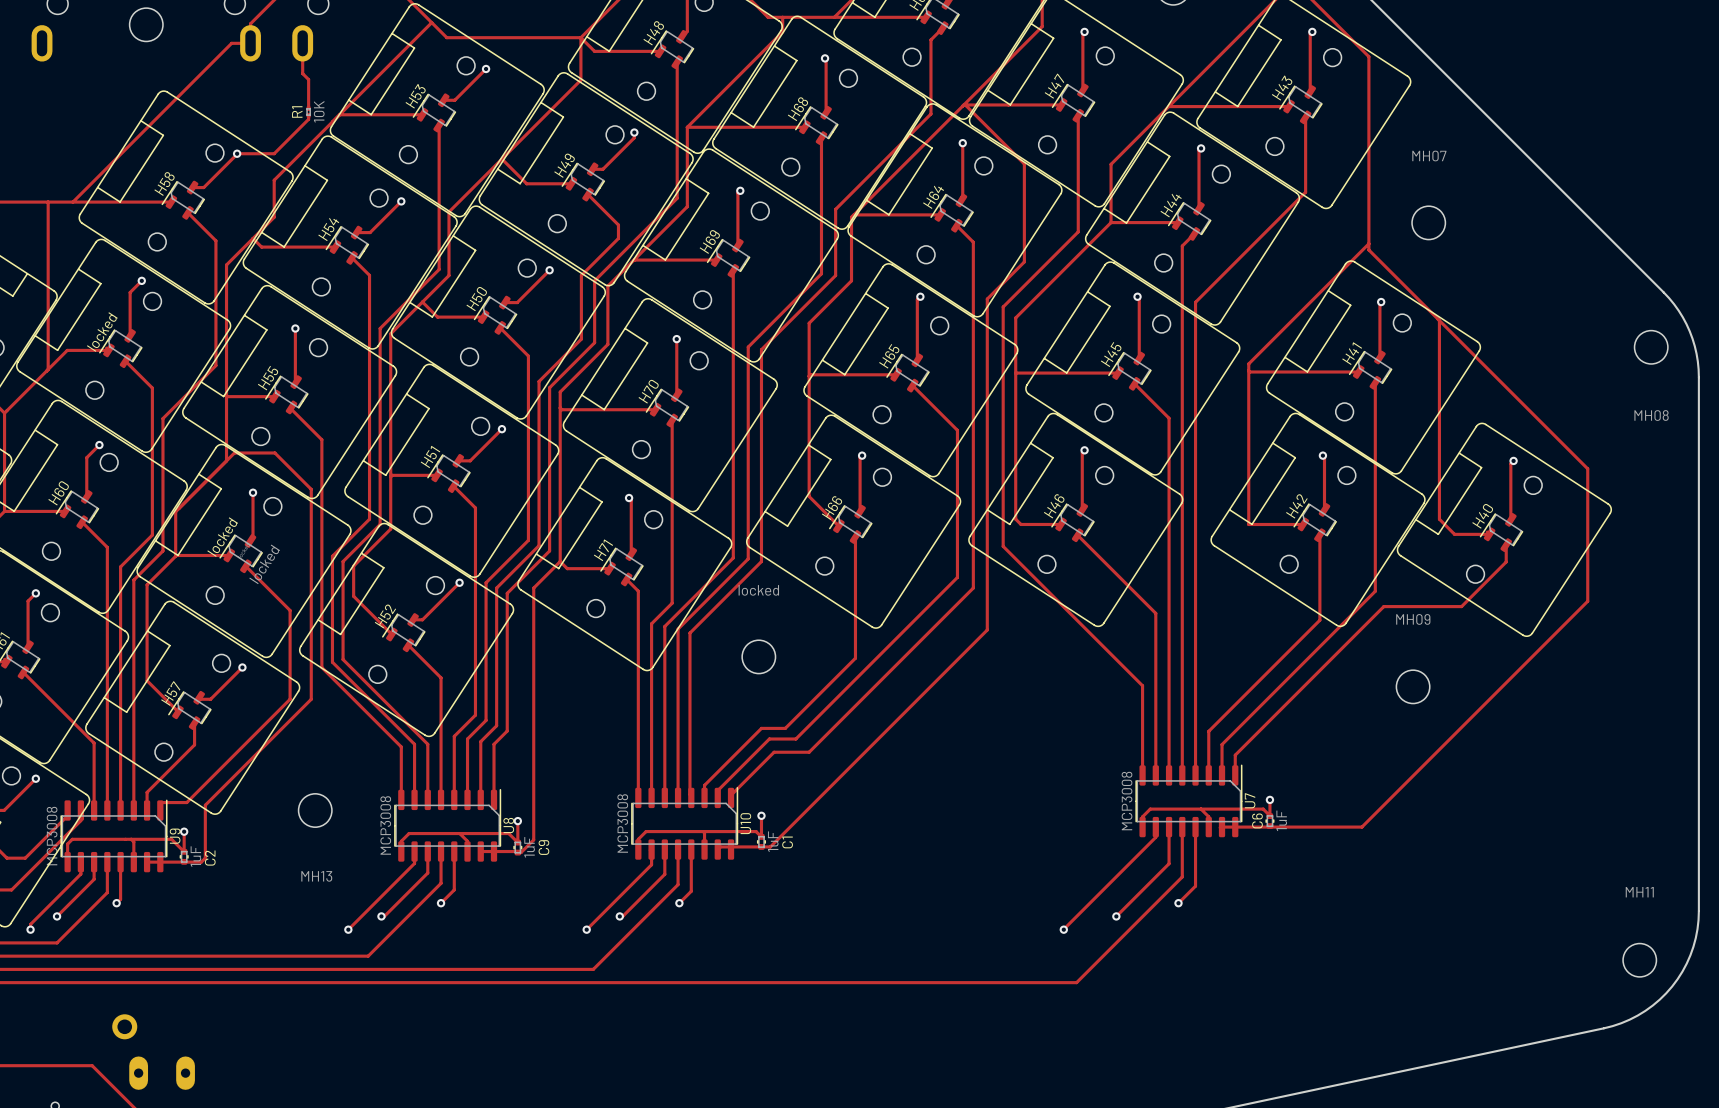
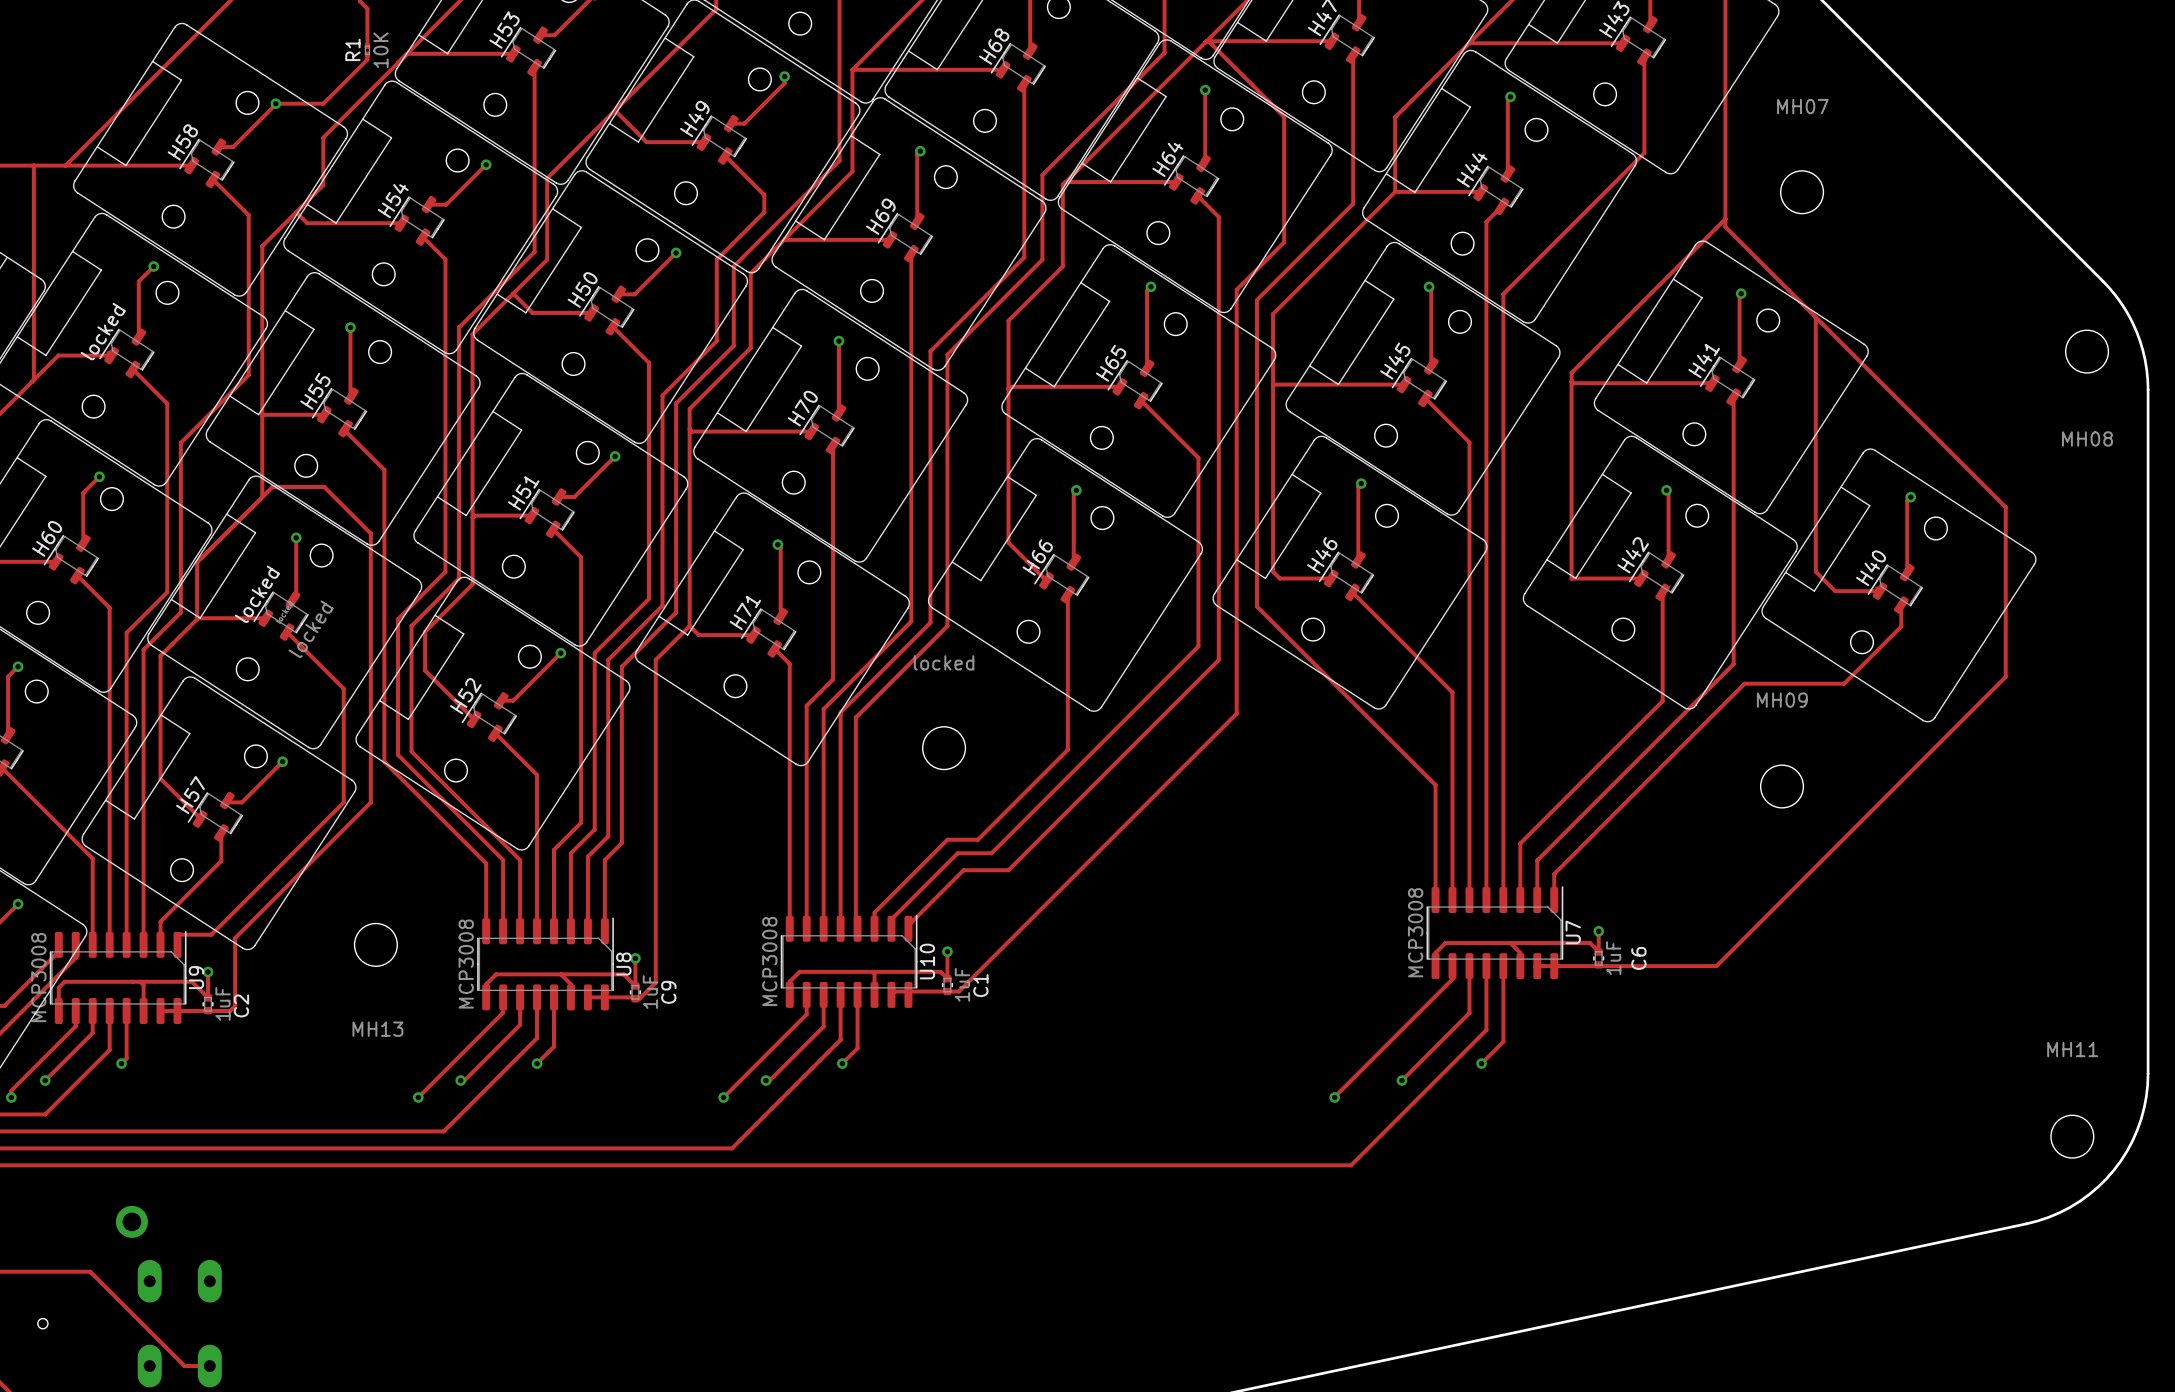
C6 name position: C6 (1257, 820) -> C6 (1638, 958)

